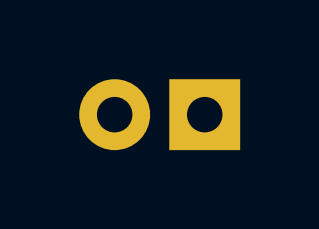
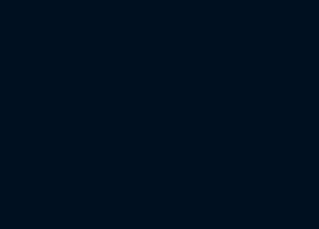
part: (159, 114) -> none

